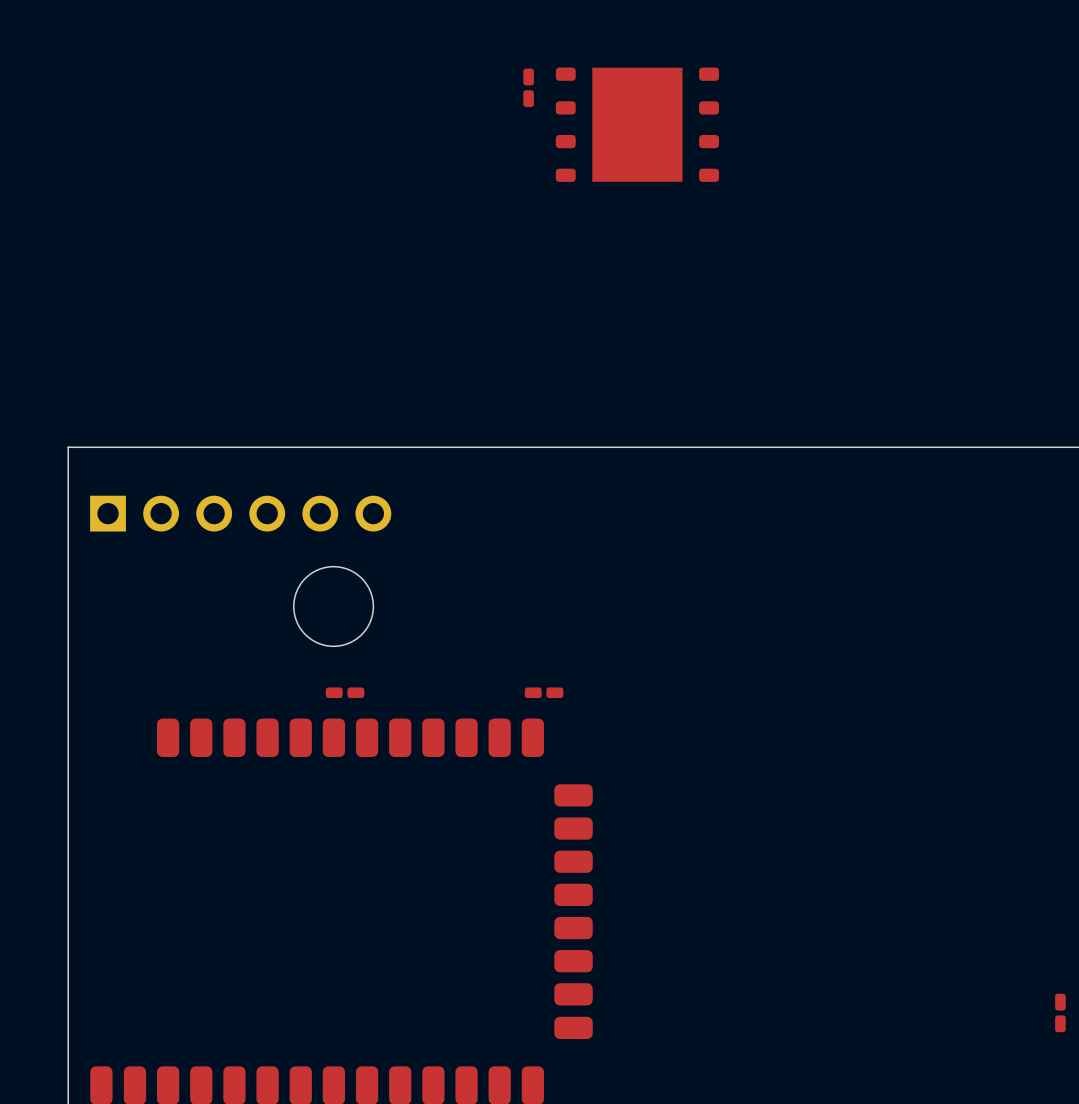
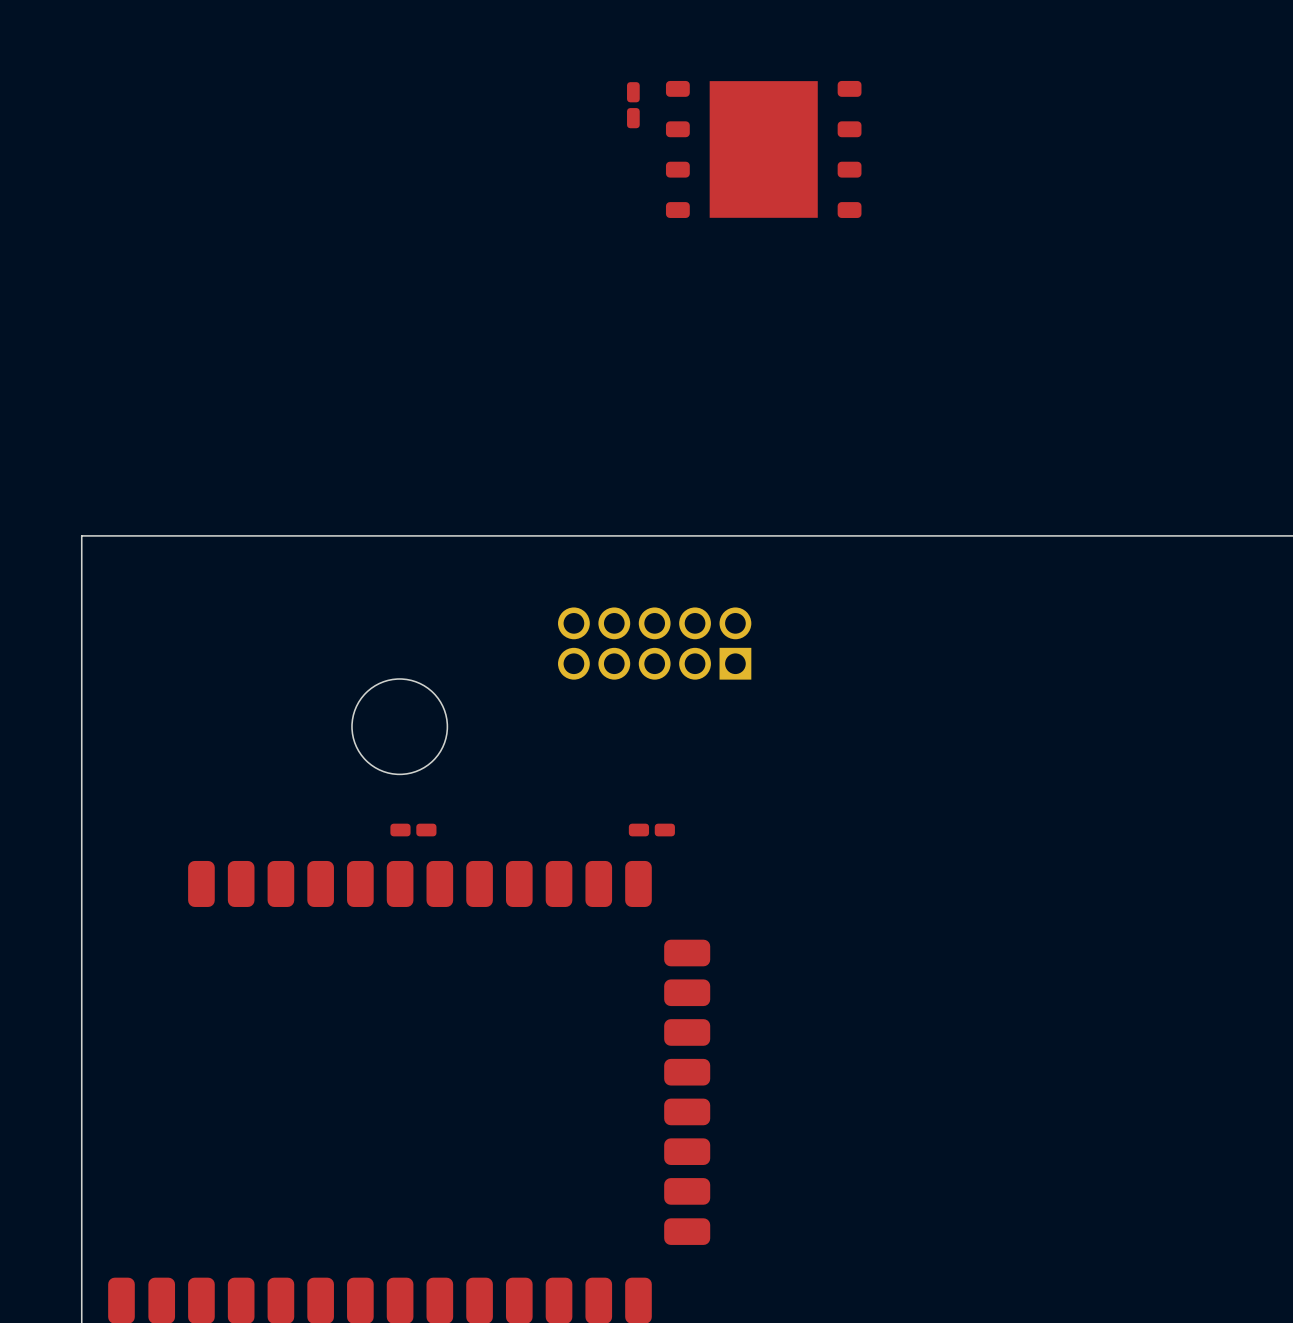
part: (240, 513) -> none
part: none -> (654, 643)
part: (1060, 1012) -> none

